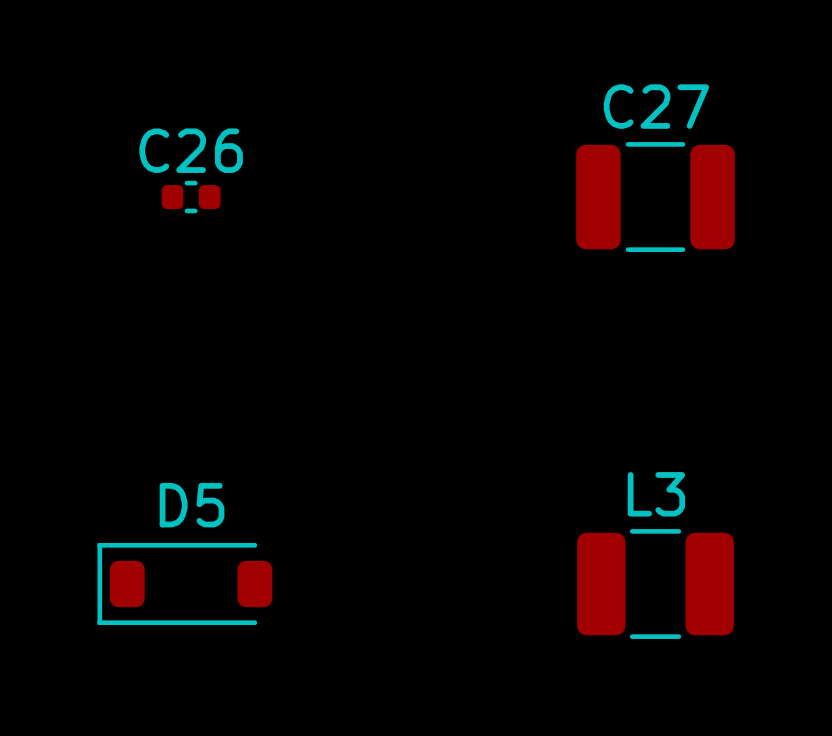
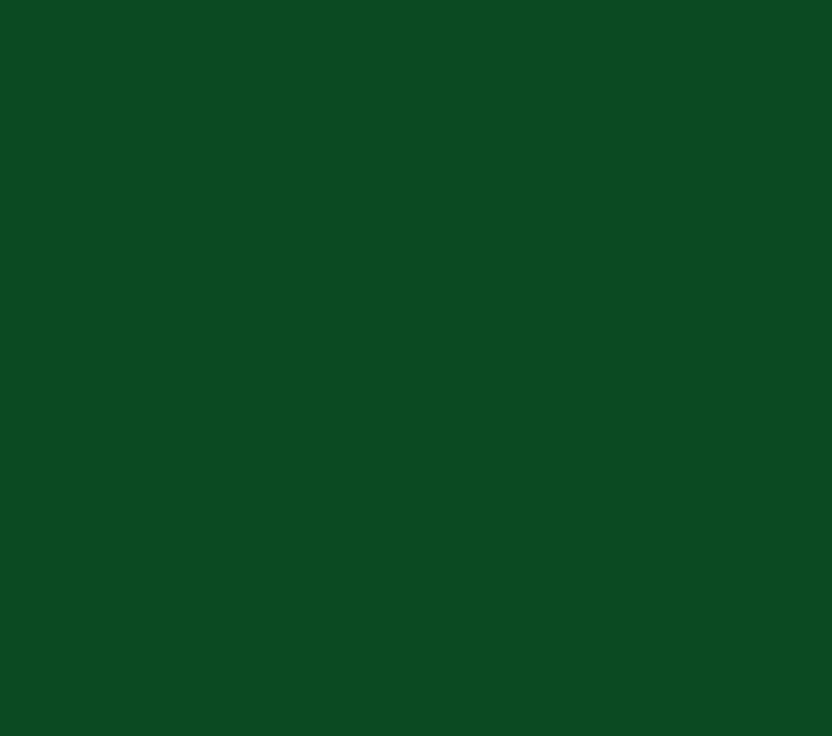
C26: (191, 197) -> none
C27: (655, 197) -> none
D5: (184, 584) -> none
L3: (655, 584) -> none

